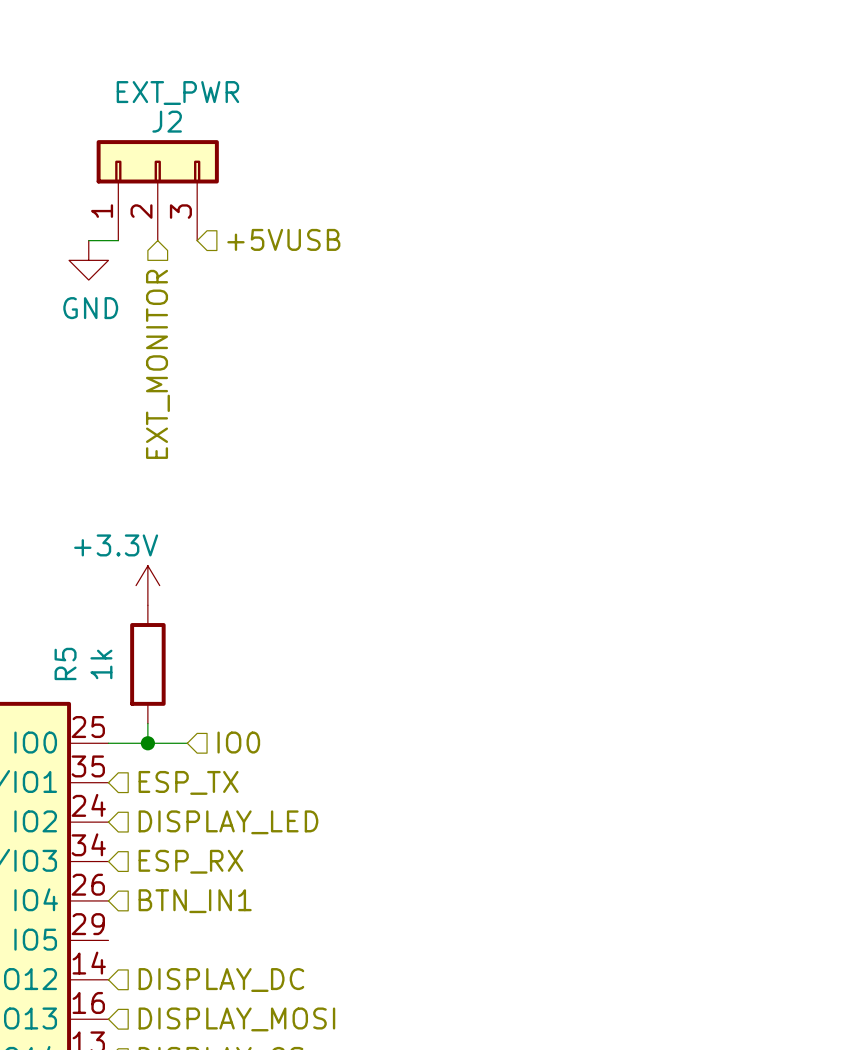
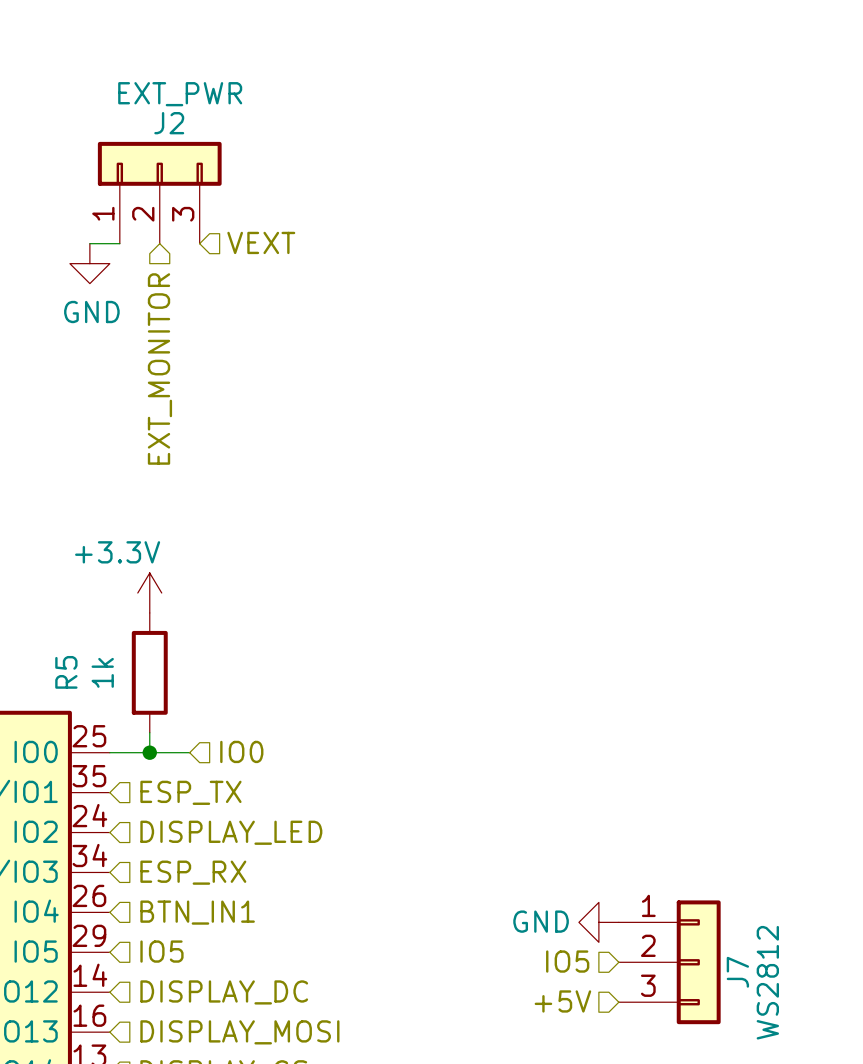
hierarchical label: +5VUSB (283, 239) -> VEXT (261, 242)
power symbol: none -> GND (598, 922)
hierarchical label: none -> IO5 (161, 951)
hierarchical label: none -> IO5 (567, 961)
J7: none -> WS2812 (669, 962)
hierarchical label: none -> +5V (562, 1001)

